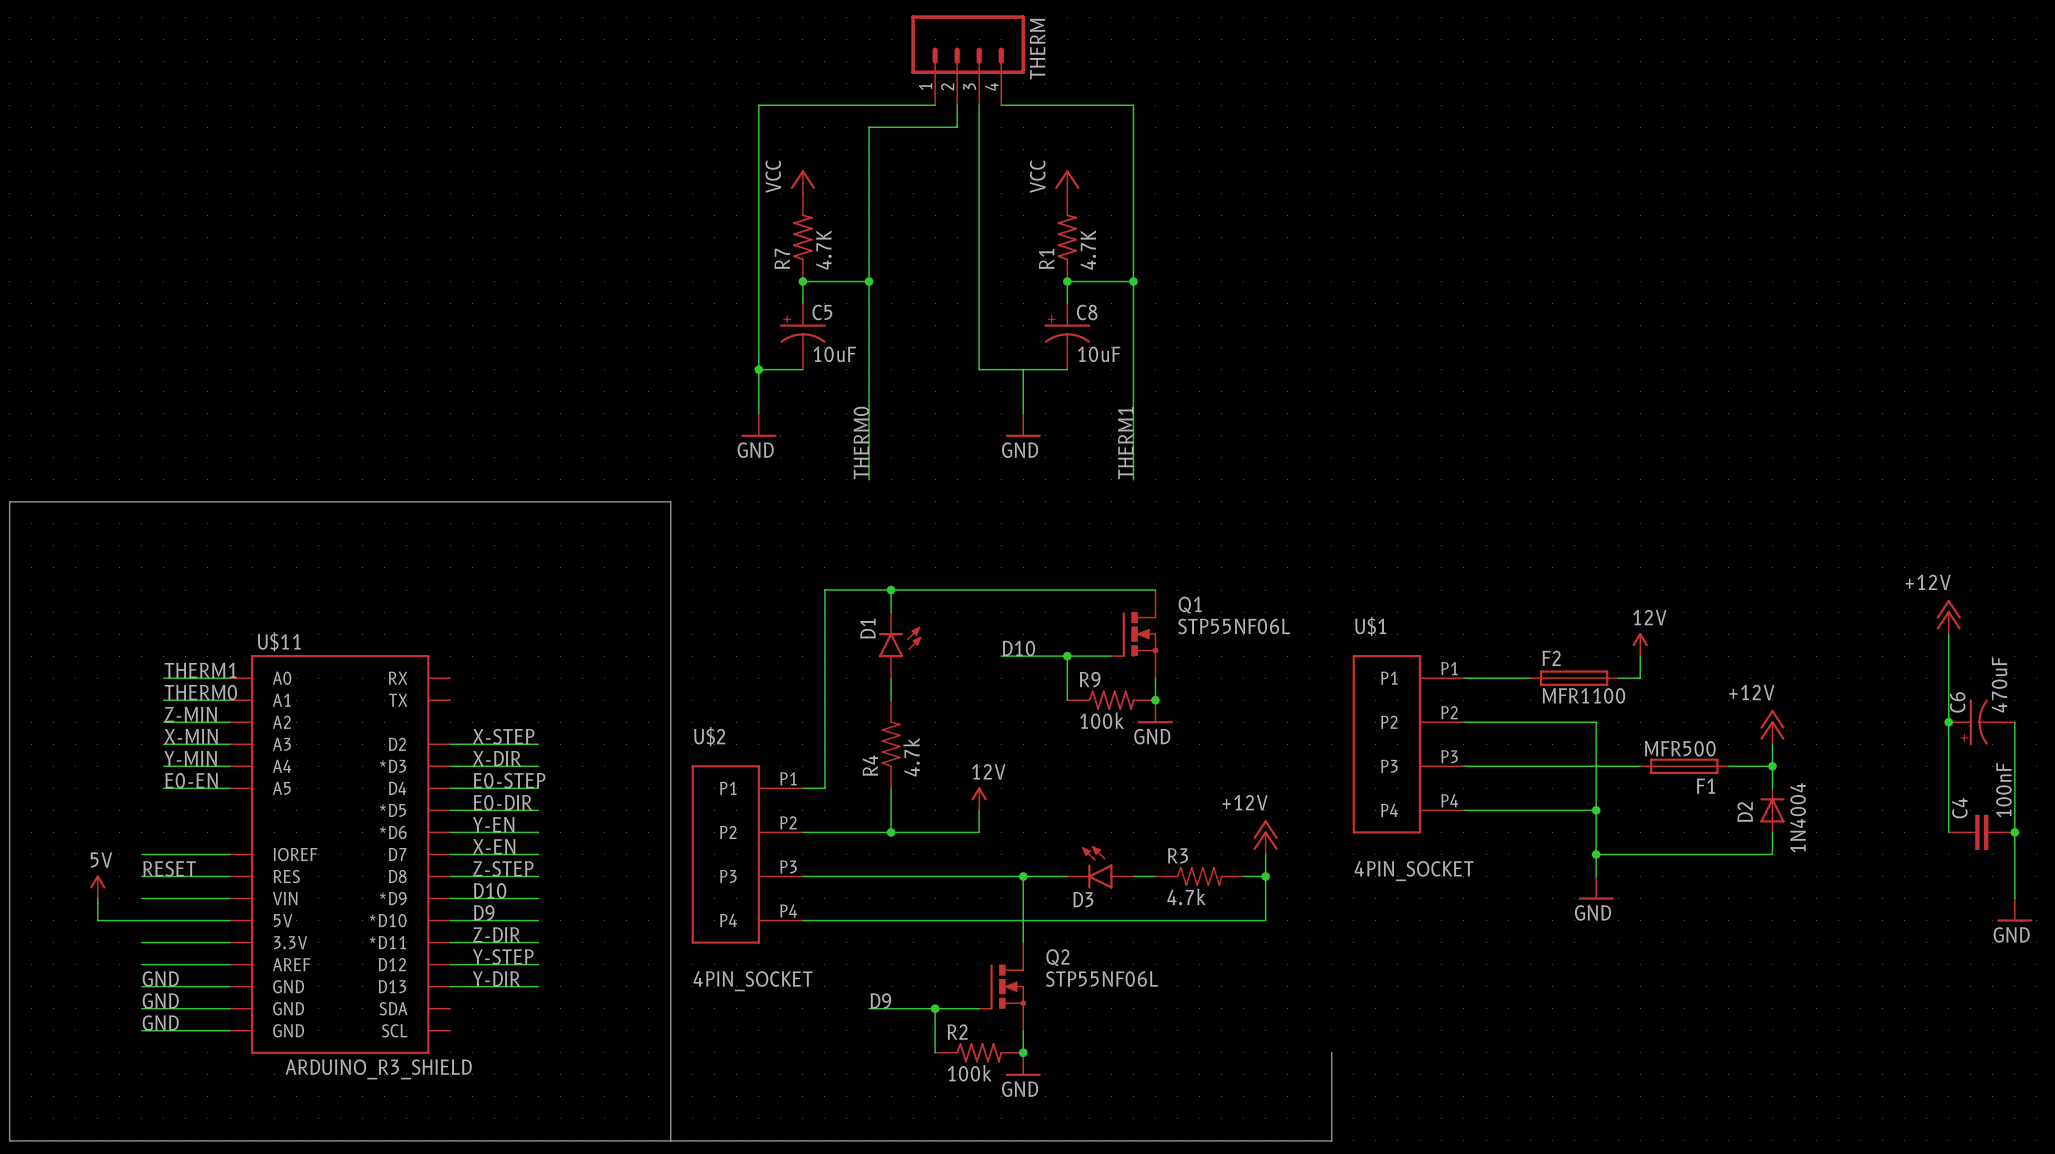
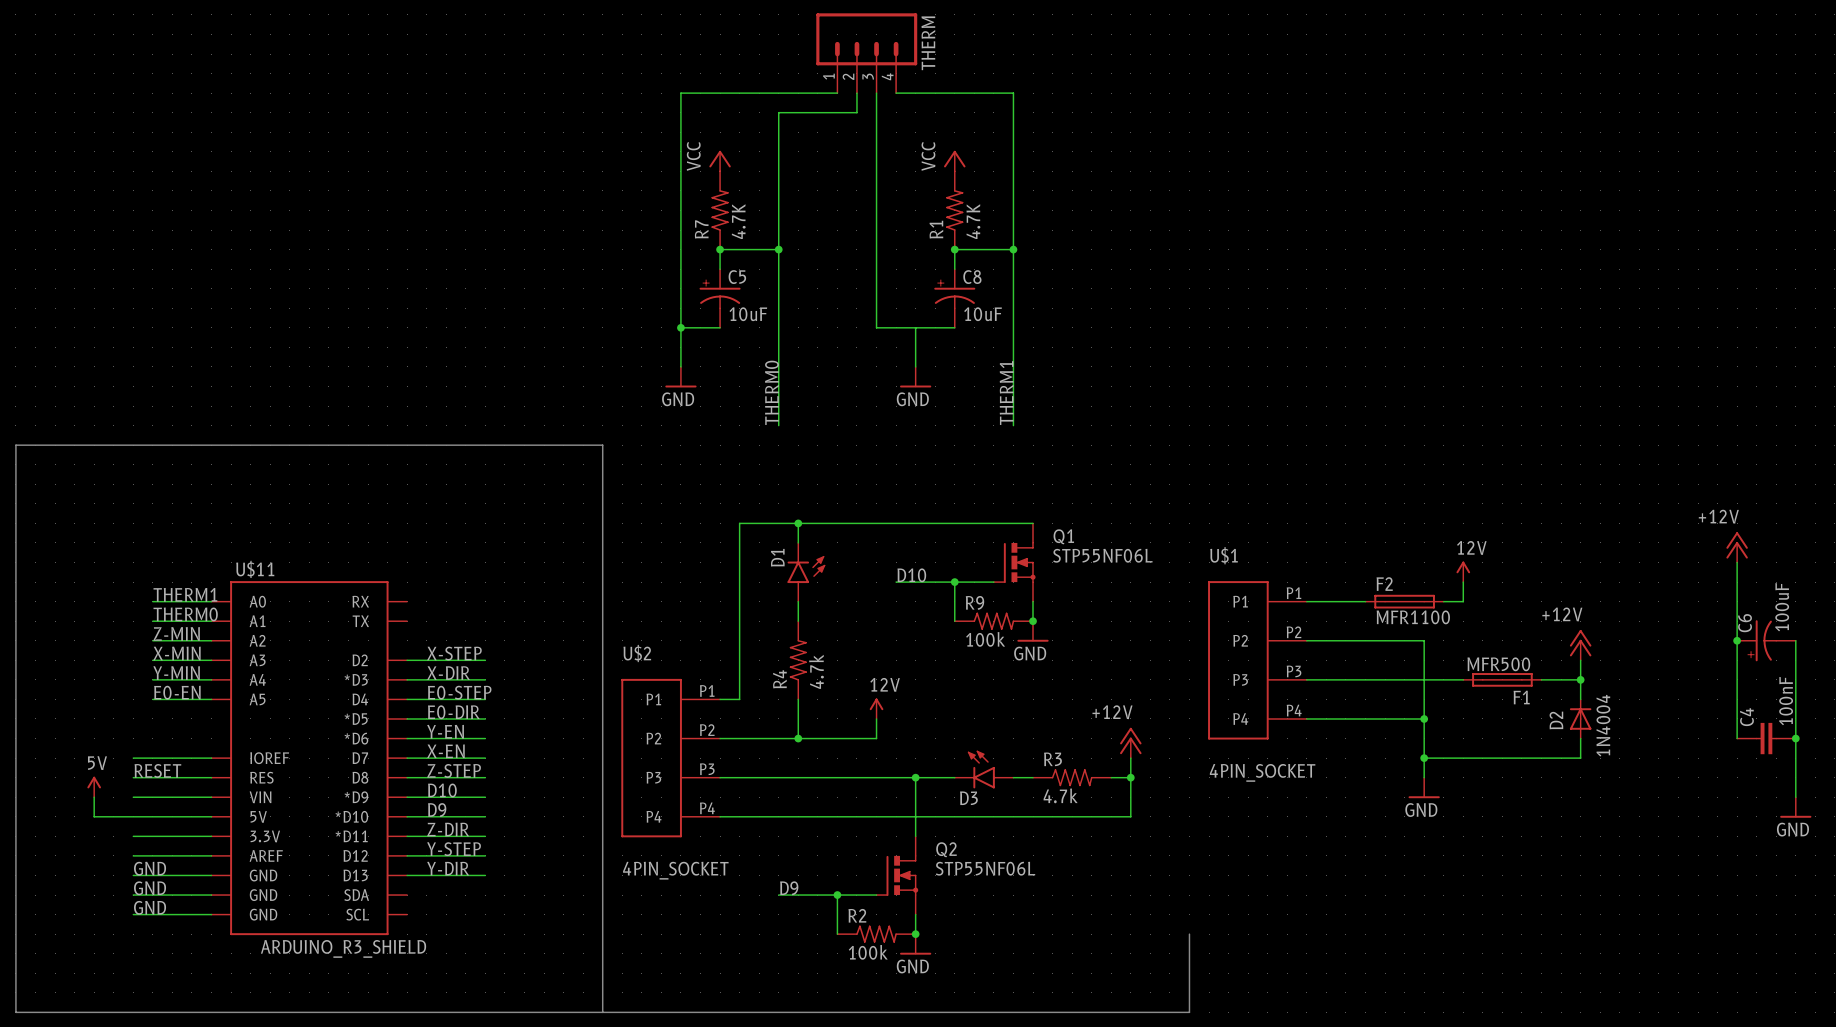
C6 value: 470uF (1999, 684) -> 100uF (1782, 607)

